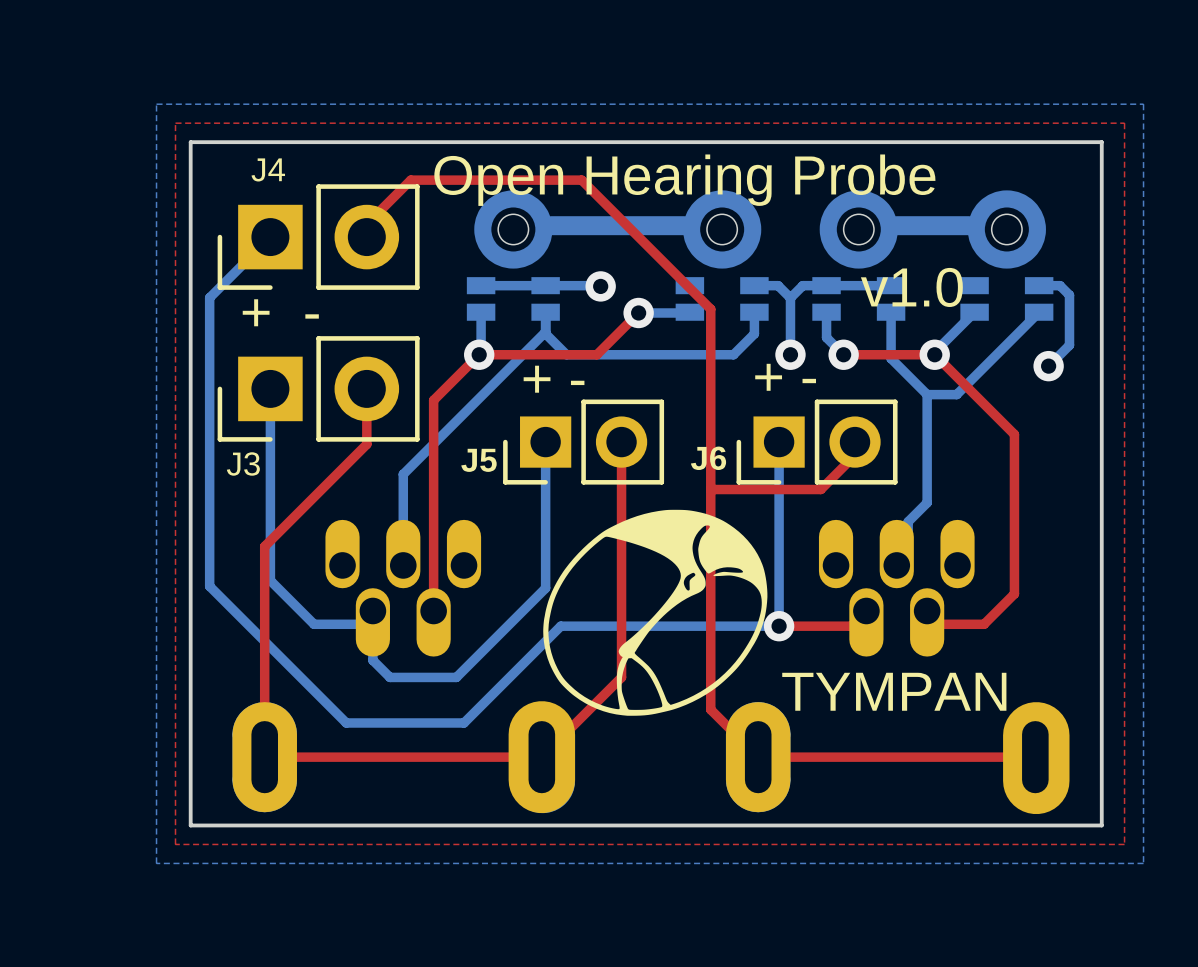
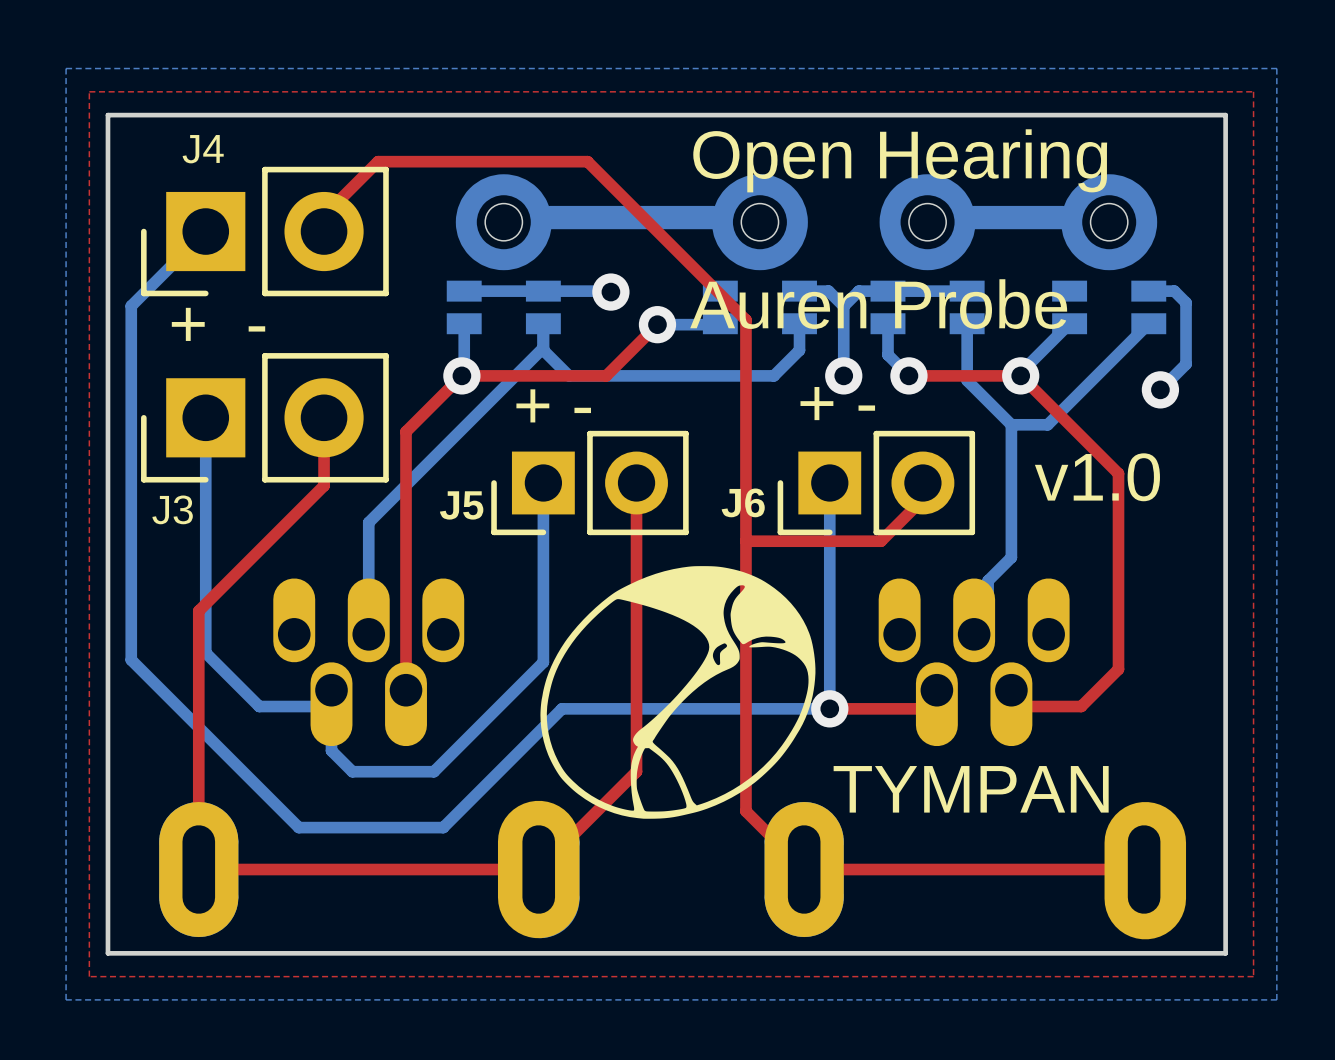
text: Open Hearing Probe (684, 180) -> Open Hearing (900, 160)
text position: v1.0 (911, 287) -> v1.0 (1097, 477)
text: none -> Auren Probe (878, 304)

